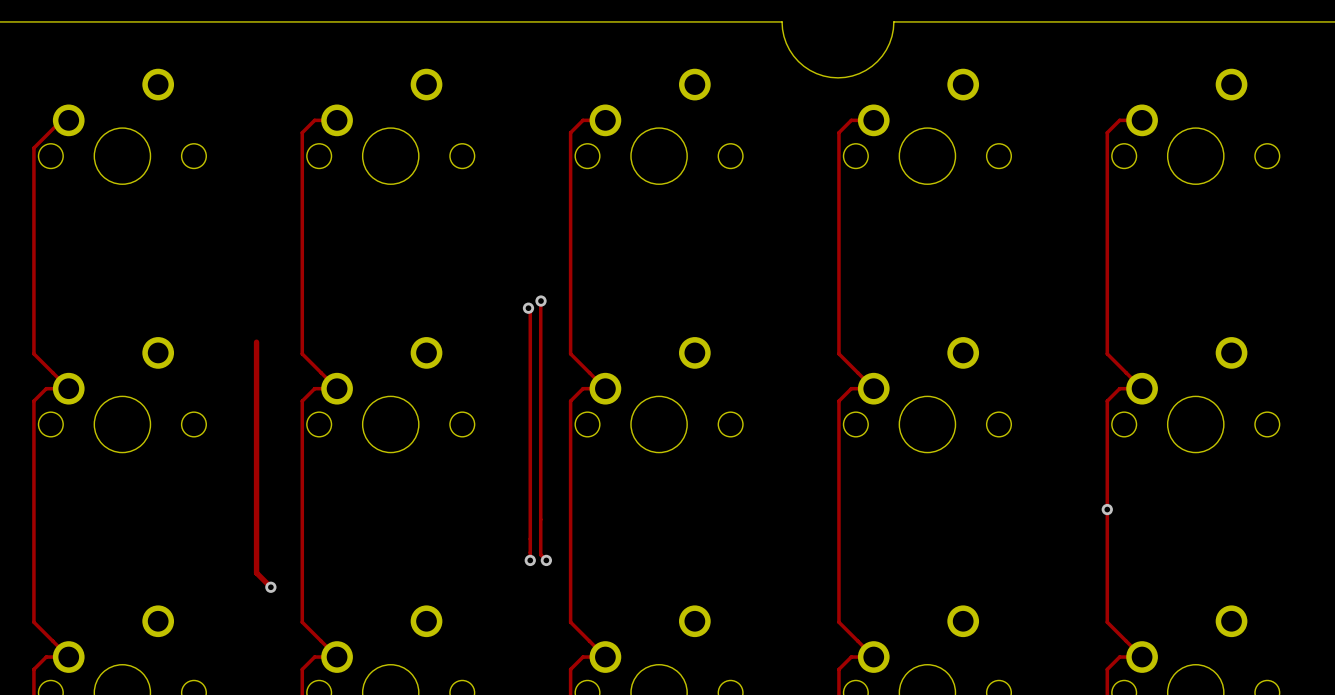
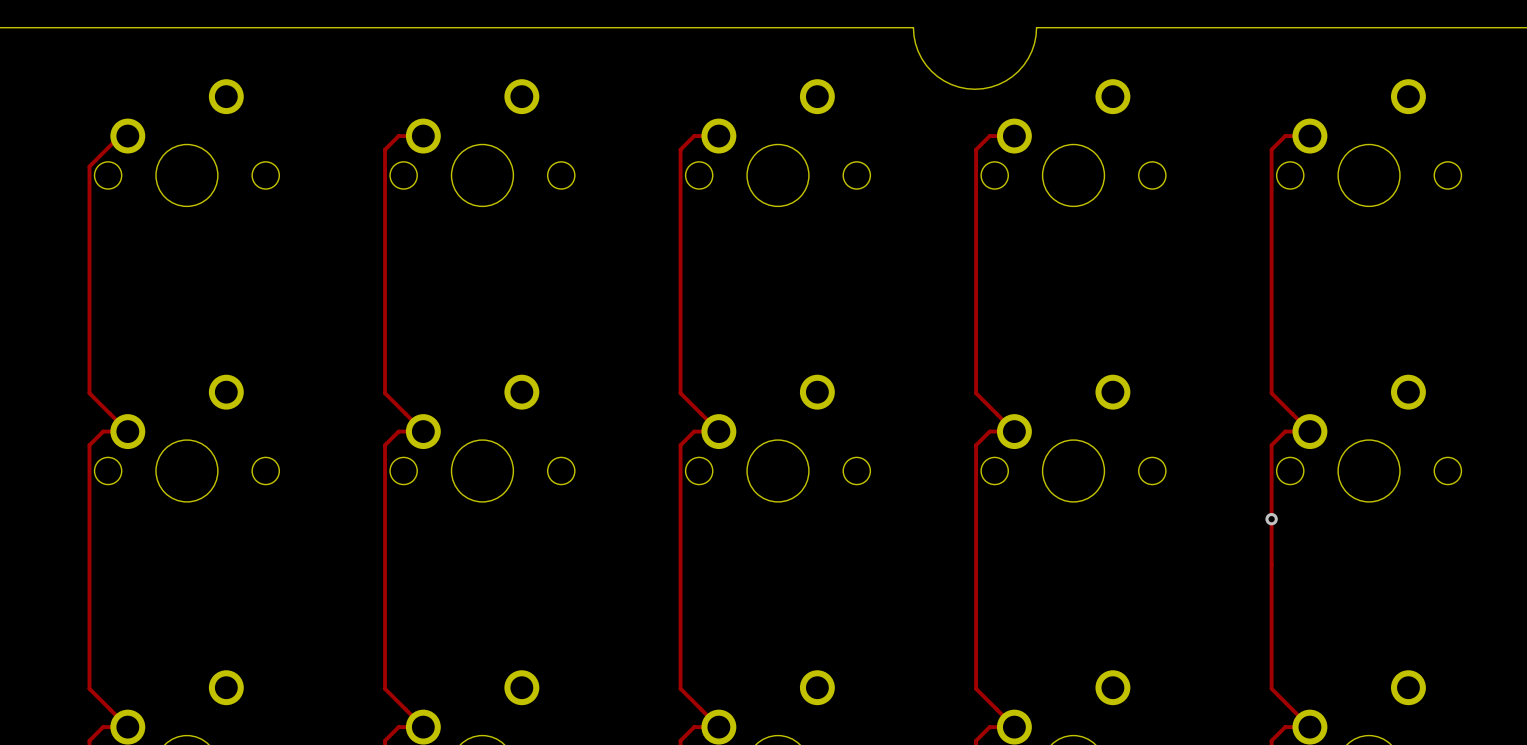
track: (541, 301) (540, 554) (546, 560) -> none
via: (541, 301) -> none
track: (528, 308) (530, 309) (530, 560) -> none
via: (528, 308) -> none
track: (256, 342) (256, 572) (270, 587) -> none
via position: (1107, 509) -> (1271, 519)
via: (530, 560) -> none
via: (546, 560) -> none
via: (270, 587) -> none

